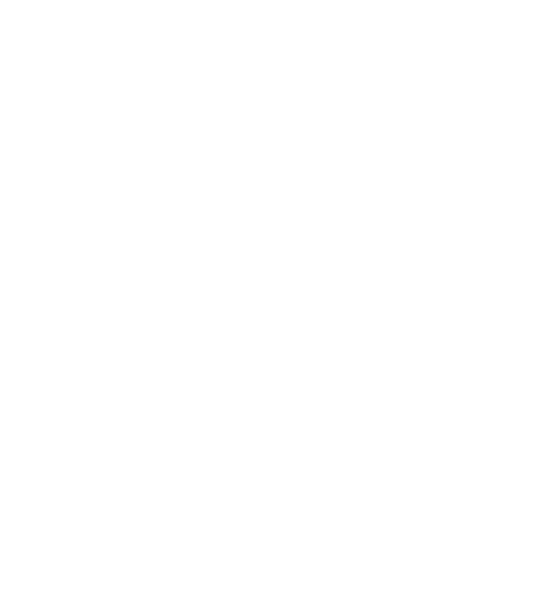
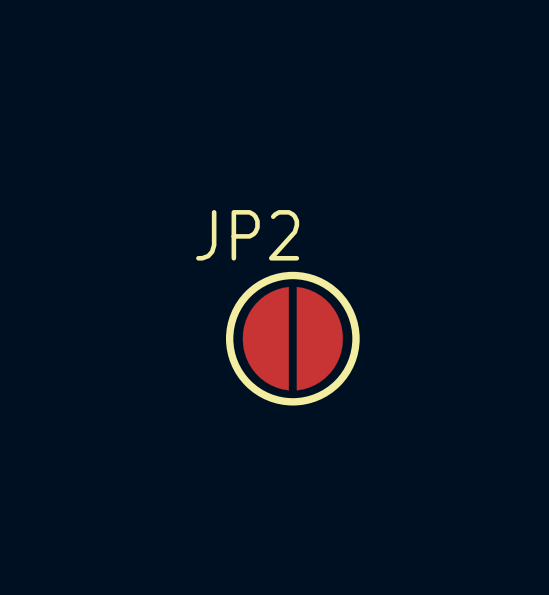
JP2: none -> (292, 338)

